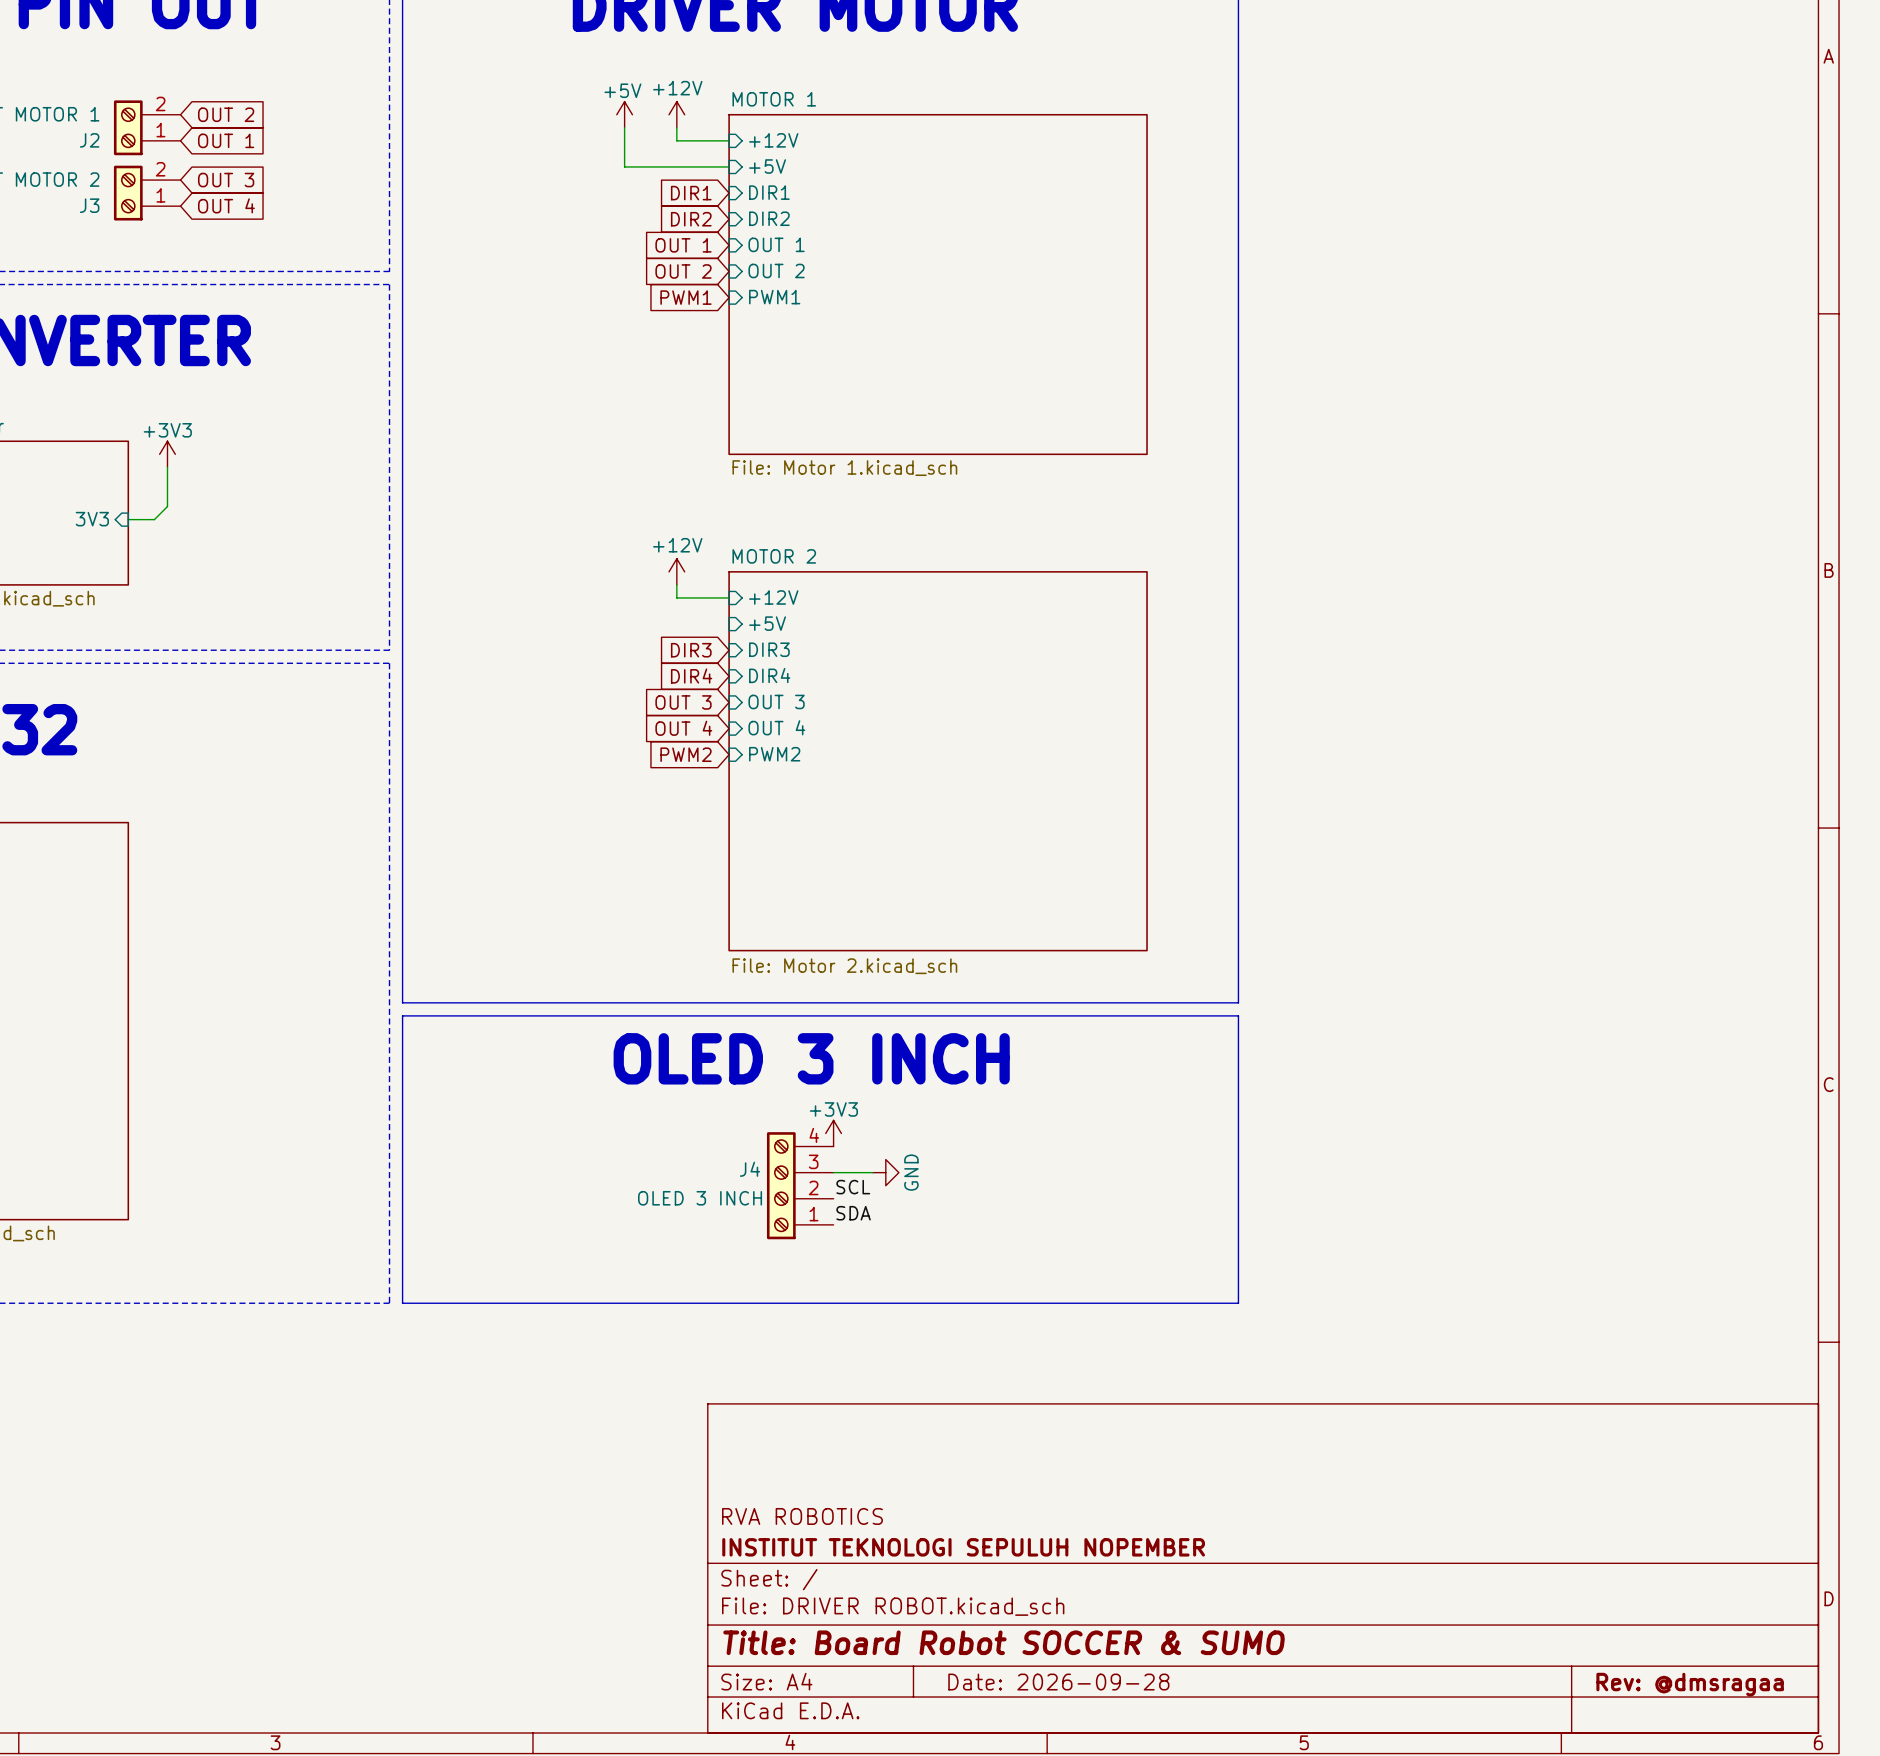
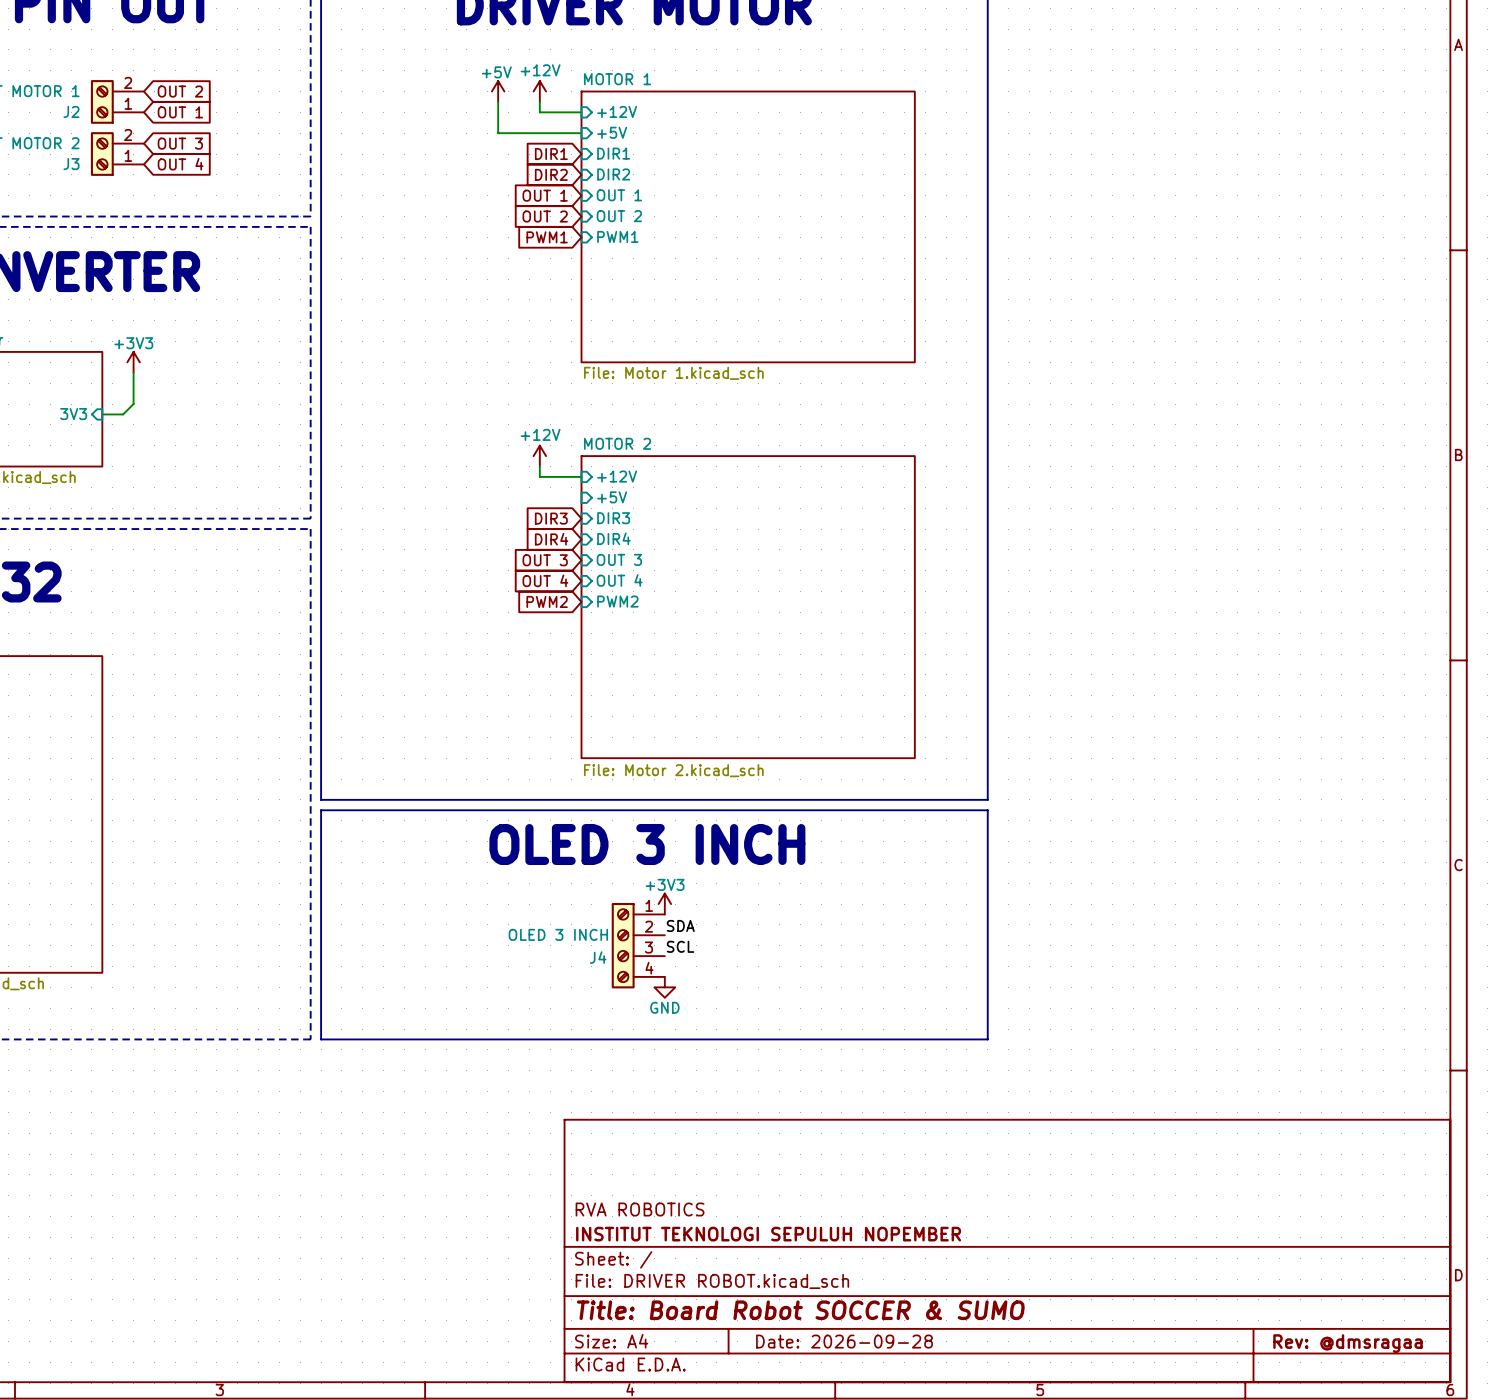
wire: (833, 1172) (872, 1172) -> none
power symbol rotation: 0° (885, 1172) -> 90° clockwise (664, 987)
power symbol position: GND (885, 1172) -> GND (664, 987)
J4 flip: as is (781, 1185) -> up-down (623, 945)
label position: SDA (853, 1213) -> SDA (680, 925)

